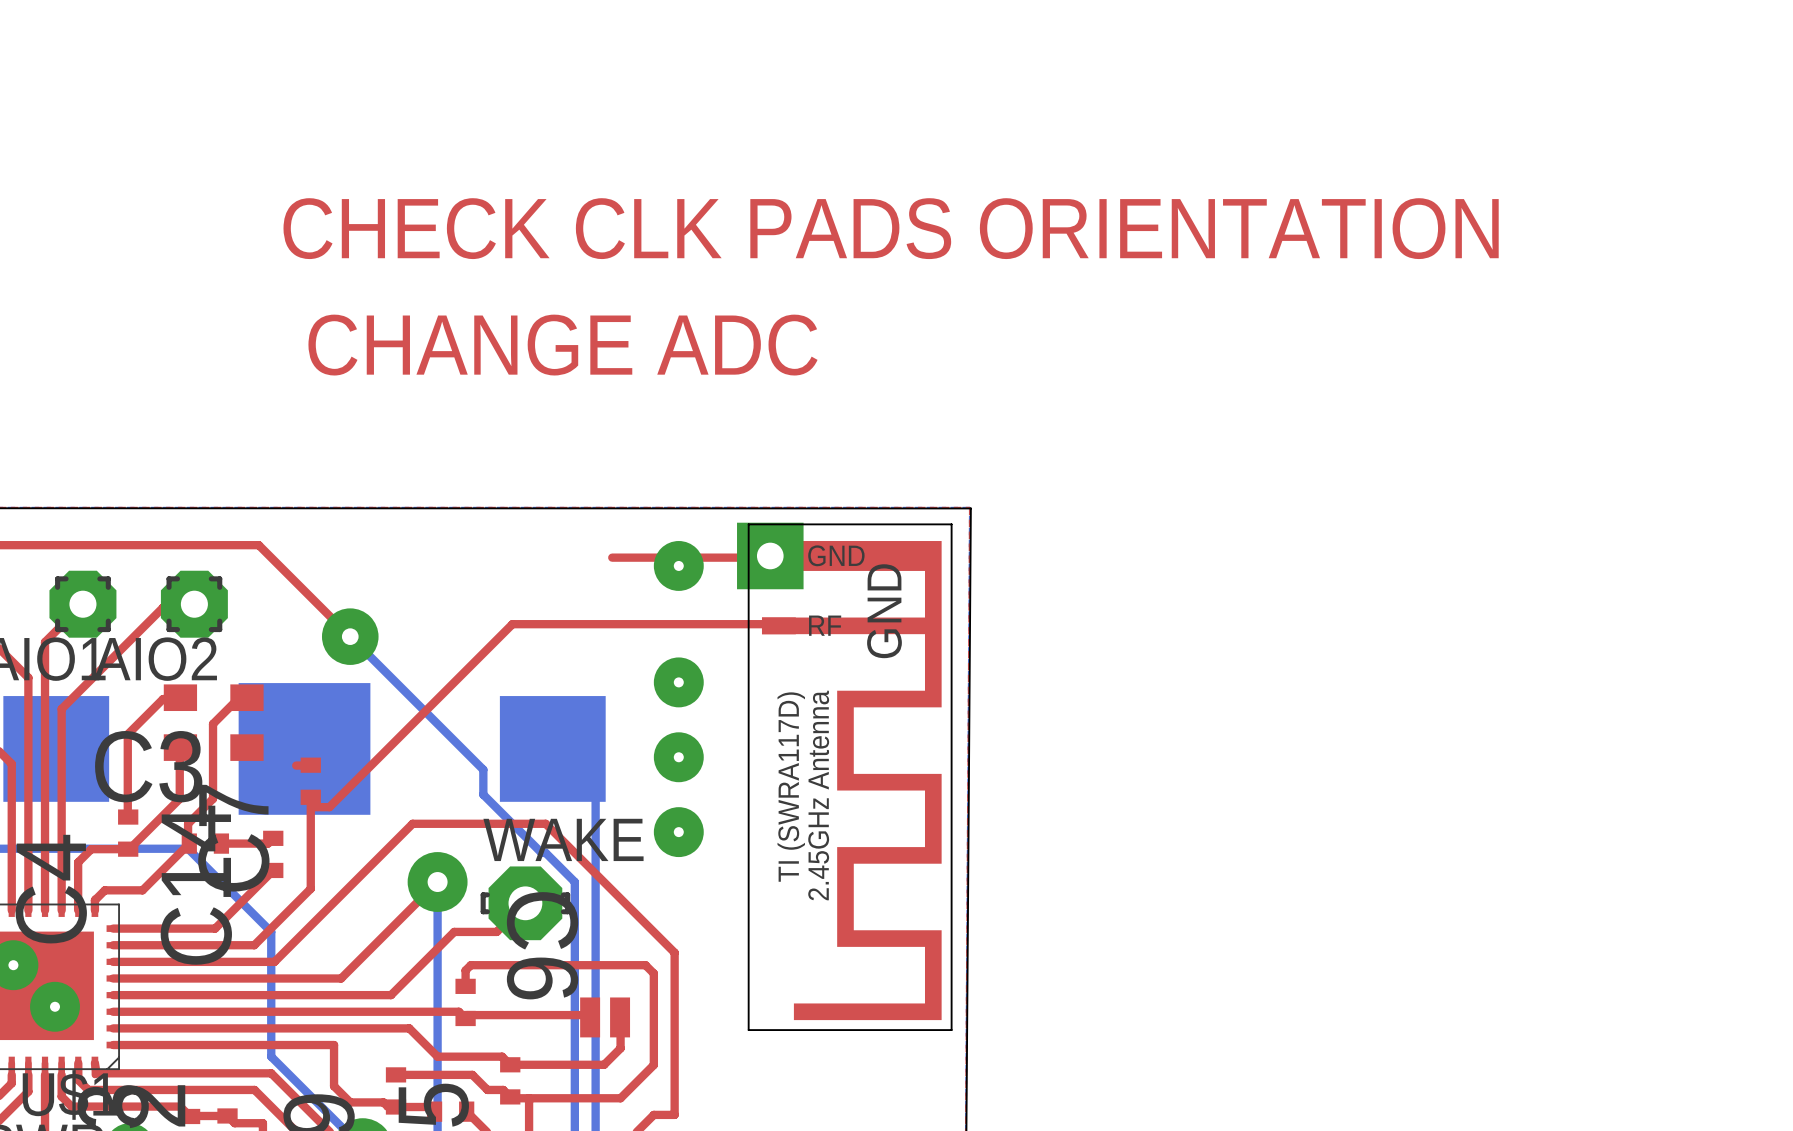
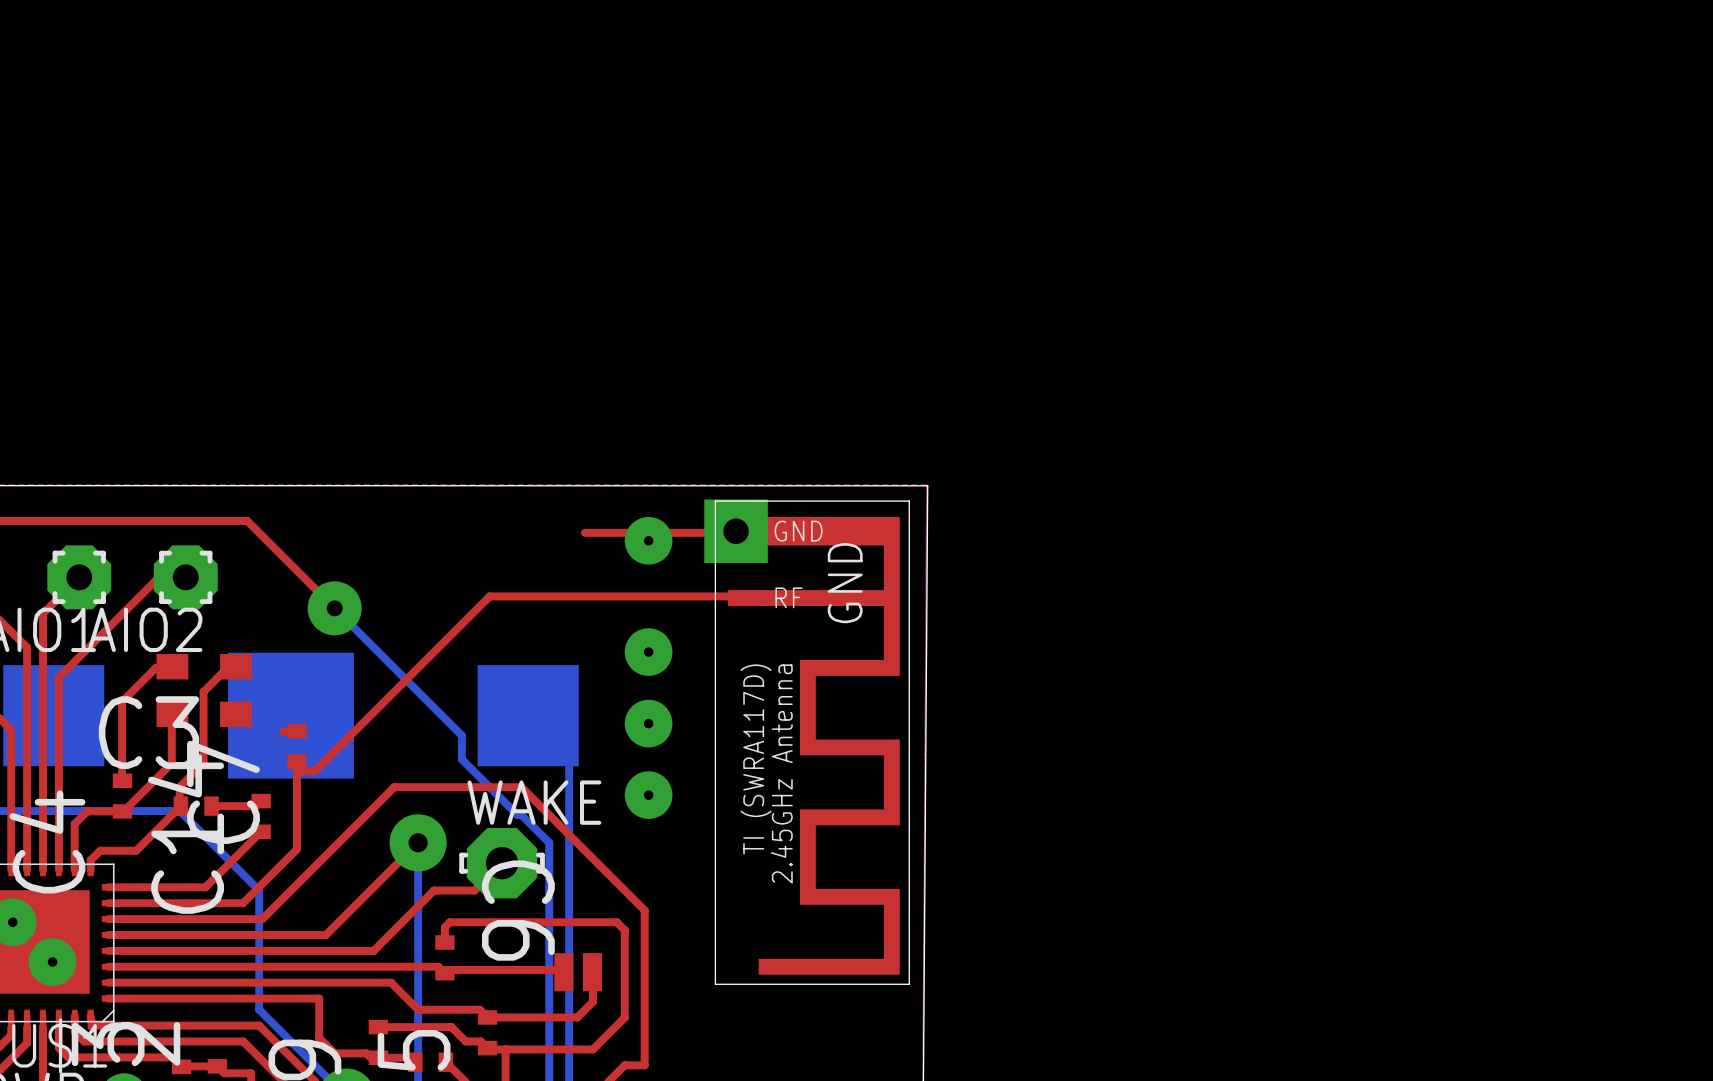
text: CHECK CLK PADS ORIENTATION (891, 228) -> none
text: CHANGE ADC (562, 345) -> none

